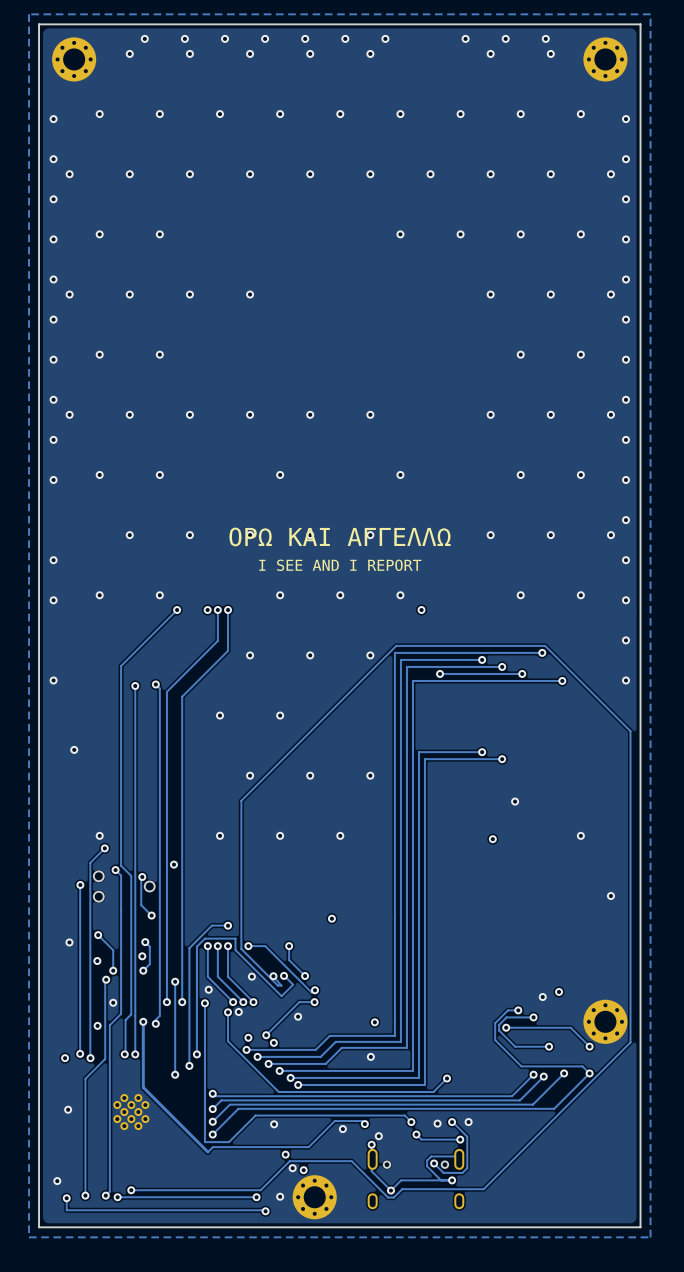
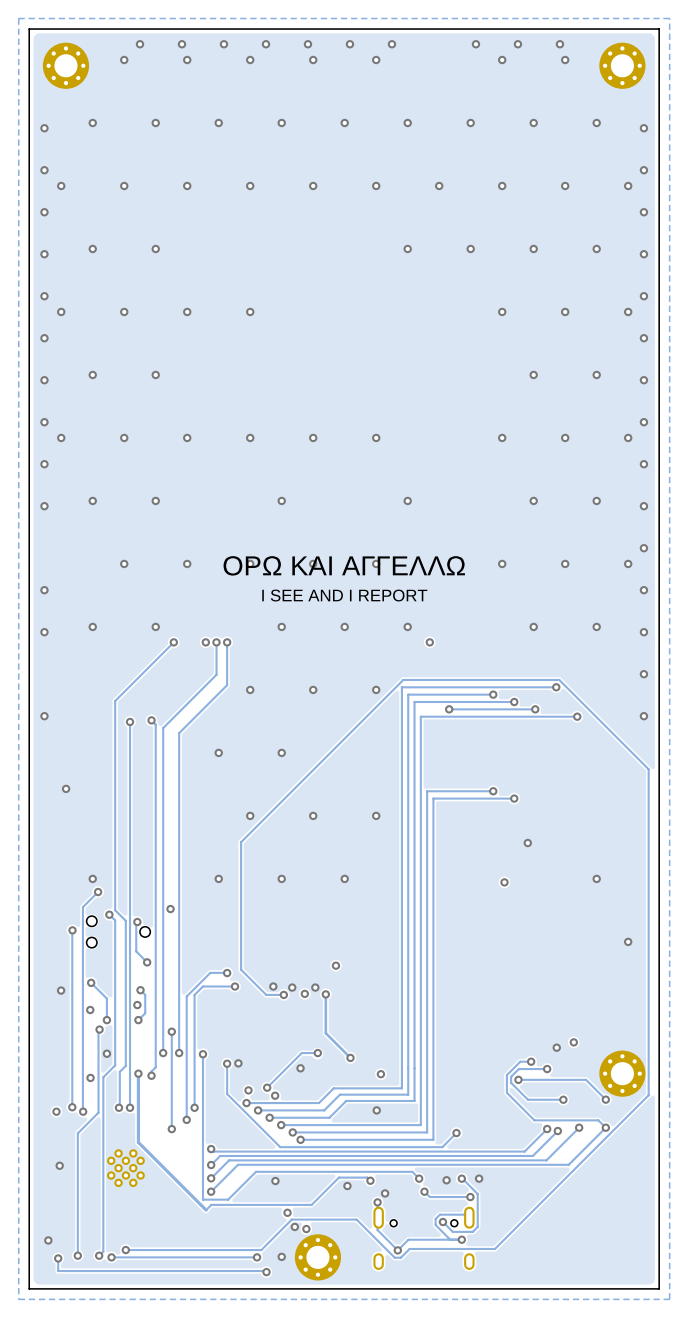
track: (241, 922) (241, 949) (277, 985) (281, 985) (273, 976) -> (241, 969) (266, 994) (283, 994)
track: (235, 938) (235, 950) (281, 996) (293, 984) (284, 975) -> none
via: none -> (235, 986)
via: none -> (273, 986)
via: none -> (292, 987)
via: none -> (315, 987)
via: none -> (304, 993)
track: (207, 946) (207, 976) (233, 1002) -> none
via: (207, 946) -> none
track: (217, 946) (217, 976) (243, 1002) -> none
via: (217, 946) -> none
track: (228, 946) (228, 976) (253, 1002) -> none
via: (228, 946) -> none
track: (248, 946) (265, 946) (311, 992) (315, 990) -> none
via: (248, 946) -> none
via: none -> (283, 994)
track: (289, 946) (289, 960) (305, 976) -> none
via: (289, 946) -> none
track: none -> (325, 994) (325, 1033) (350, 1057)
via: none -> (325, 994)
via: (284, 975) -> none
via: (251, 976) -> none
via: (273, 976) -> none
via: (305, 976) -> none
via: (208, 989) -> none
via: (315, 990) -> none
via: (233, 1002) -> none
via: (243, 1002) -> none
via: (253, 1002) -> none
via: none -> (350, 1057)

